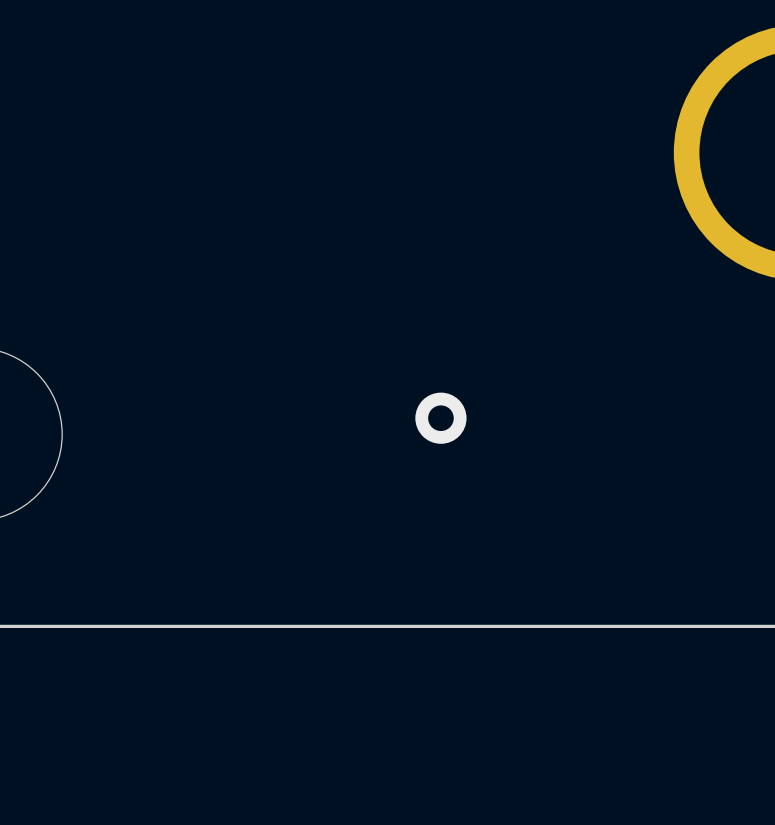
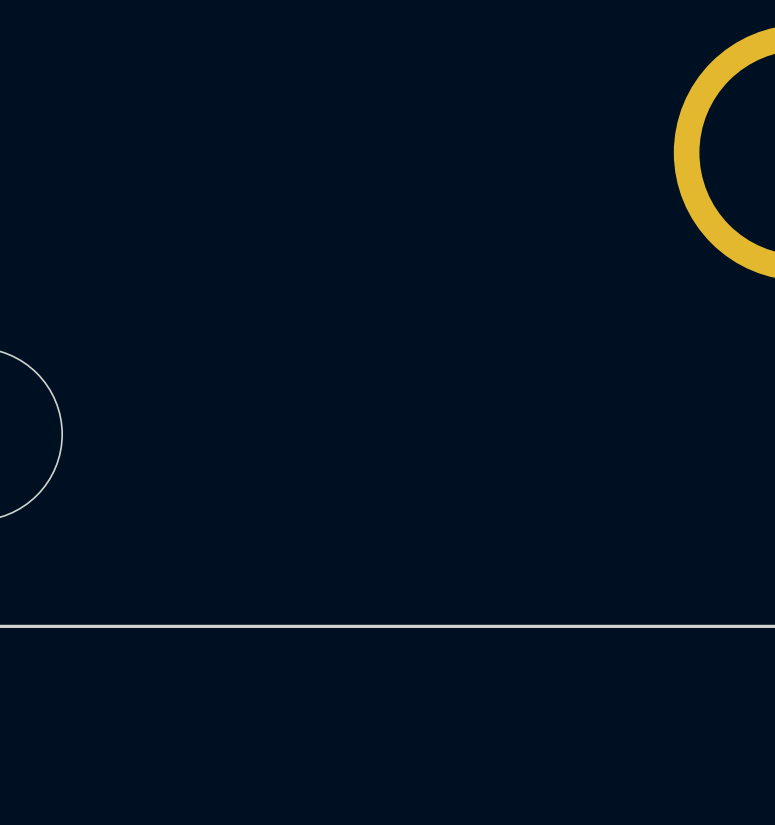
via: (440, 418) -> none

